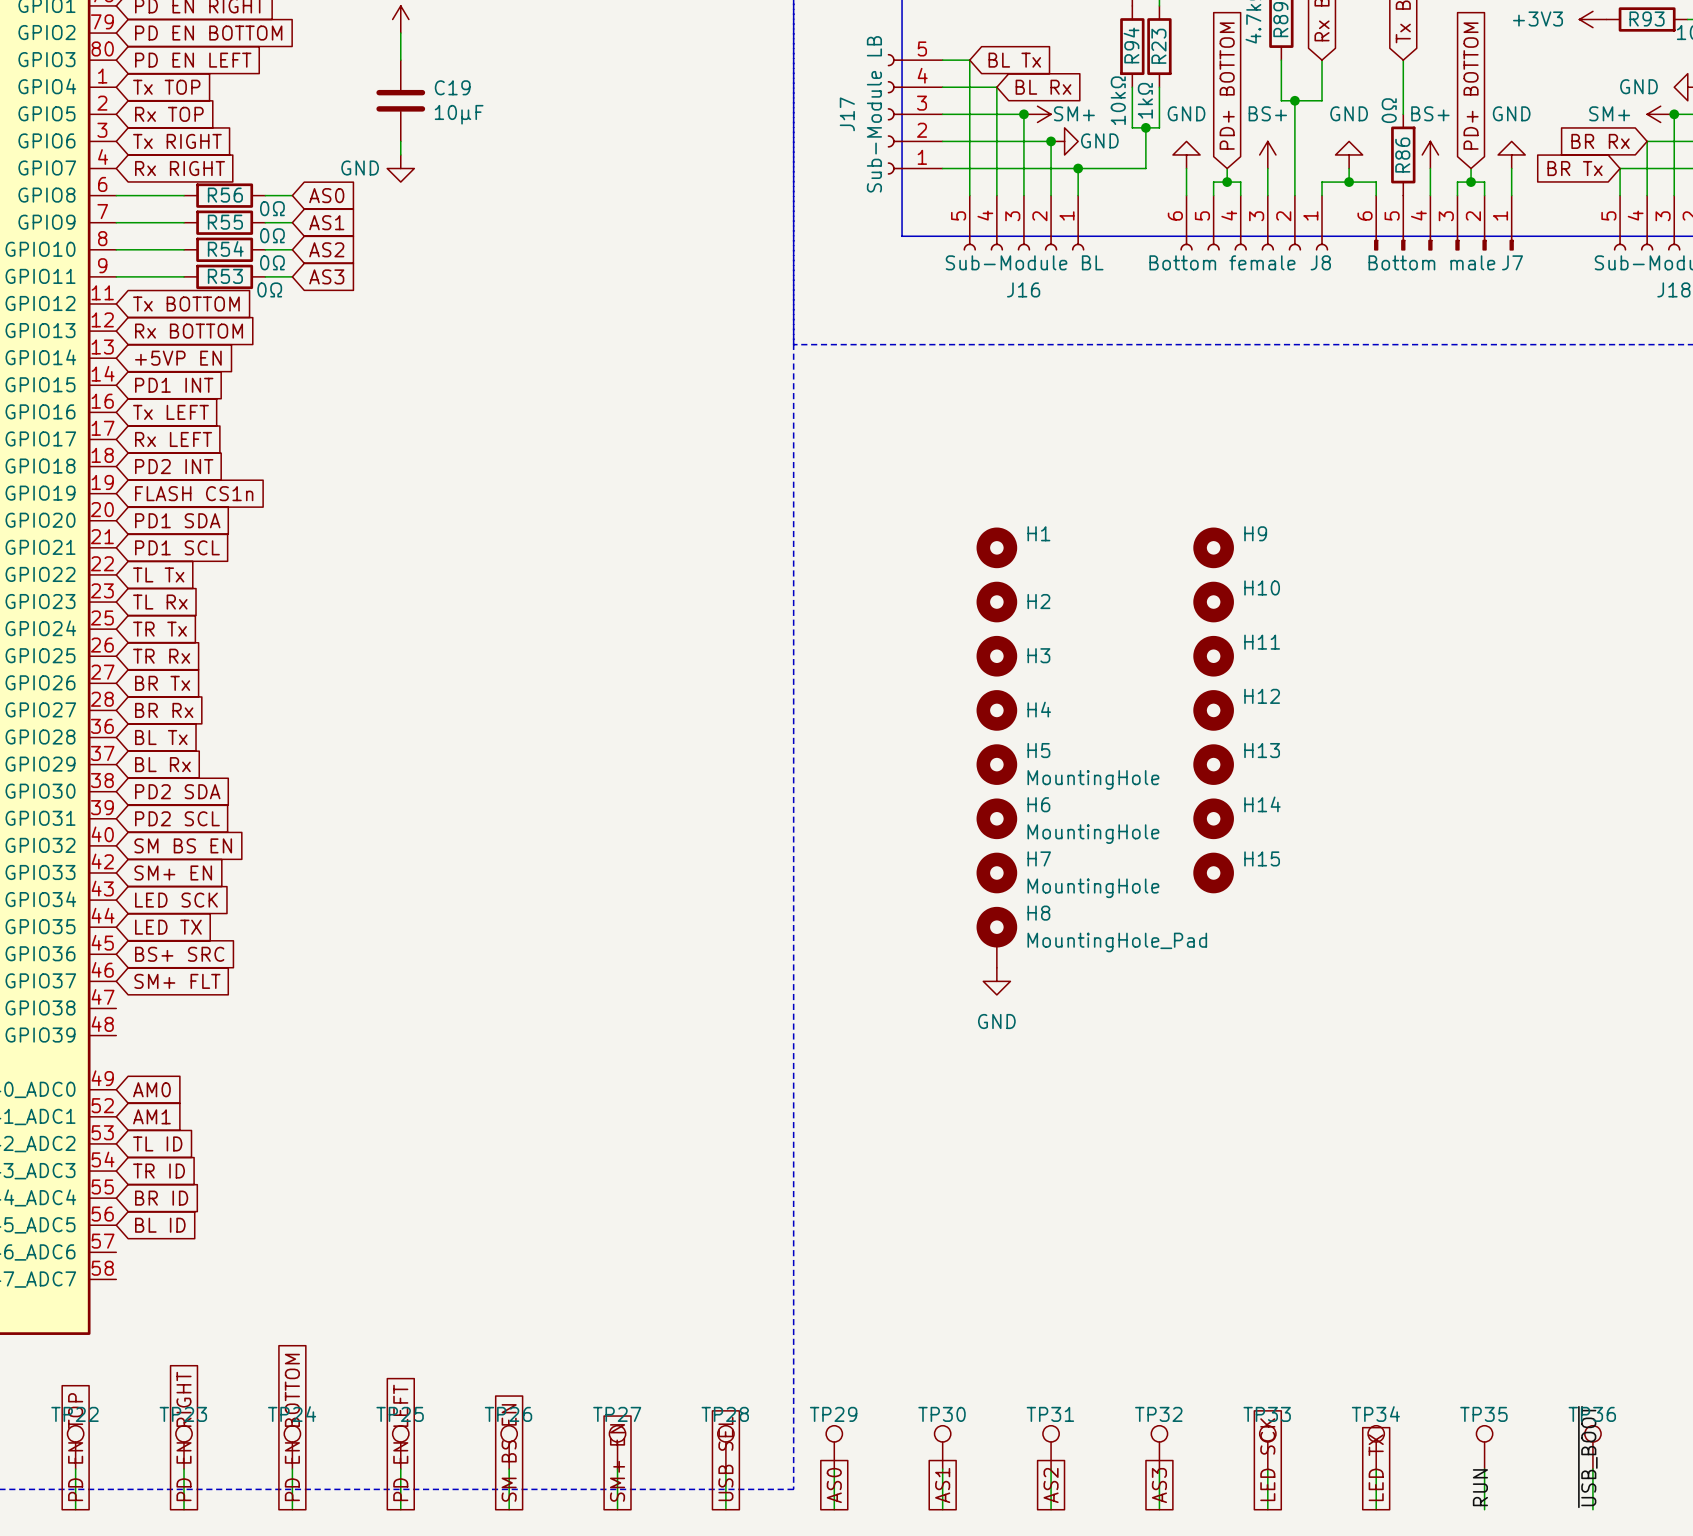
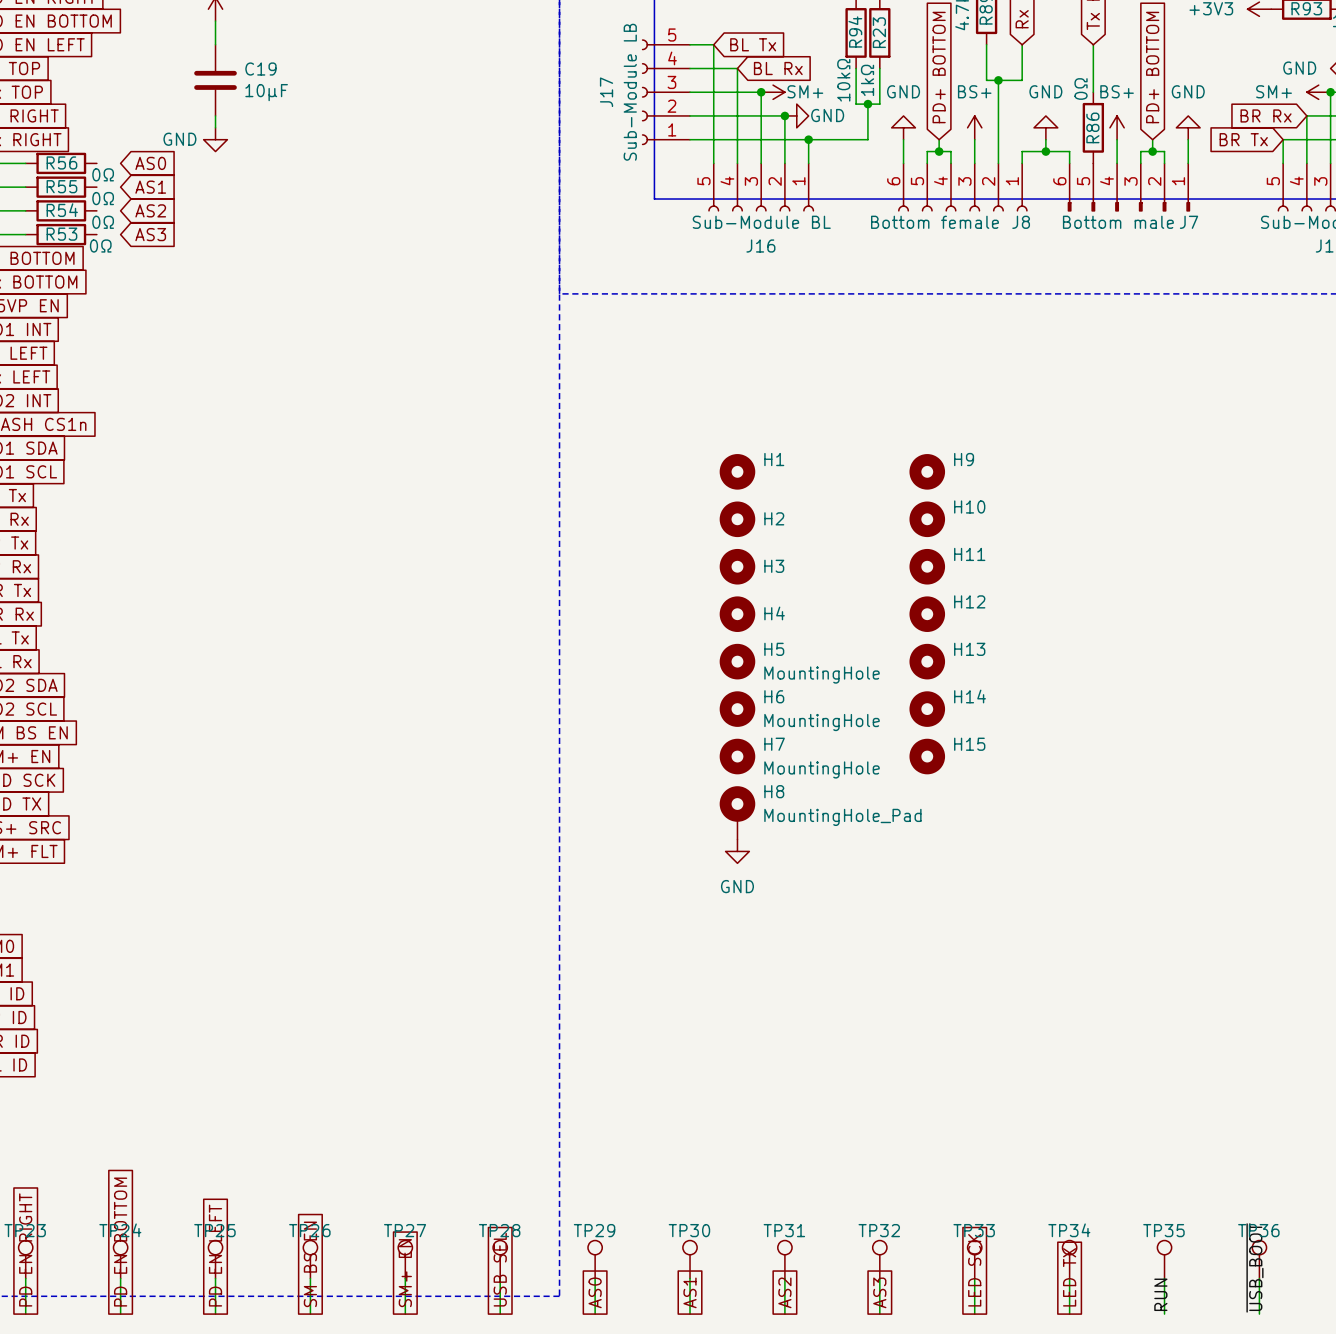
wire: (265, 195) (292, 195) -> none
wire: (265, 222) (292, 222) -> none
wire: (265, 249) (292, 249) -> none
wire: (265, 276) (292, 276) -> none

